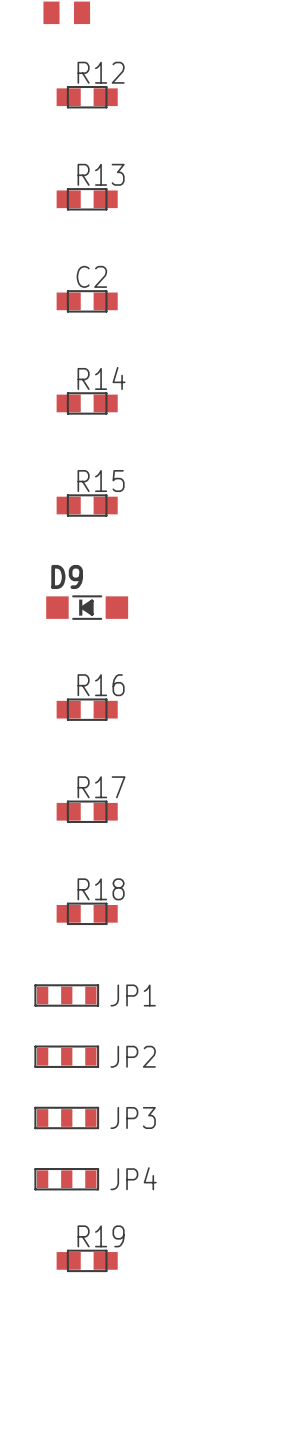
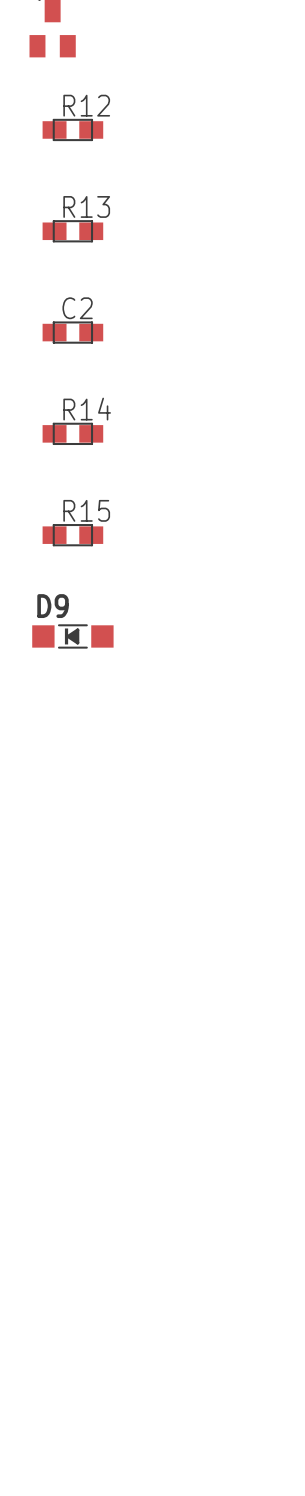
R16: (87, 709) -> none
R17: (87, 811) -> none
R18: (87, 913) -> none
JP1: (66, 995) -> none
JP2: (66, 1056) -> none
JP3: (66, 1117) -> none
JP4: (66, 1179) -> none
R19: (87, 1260) -> none

